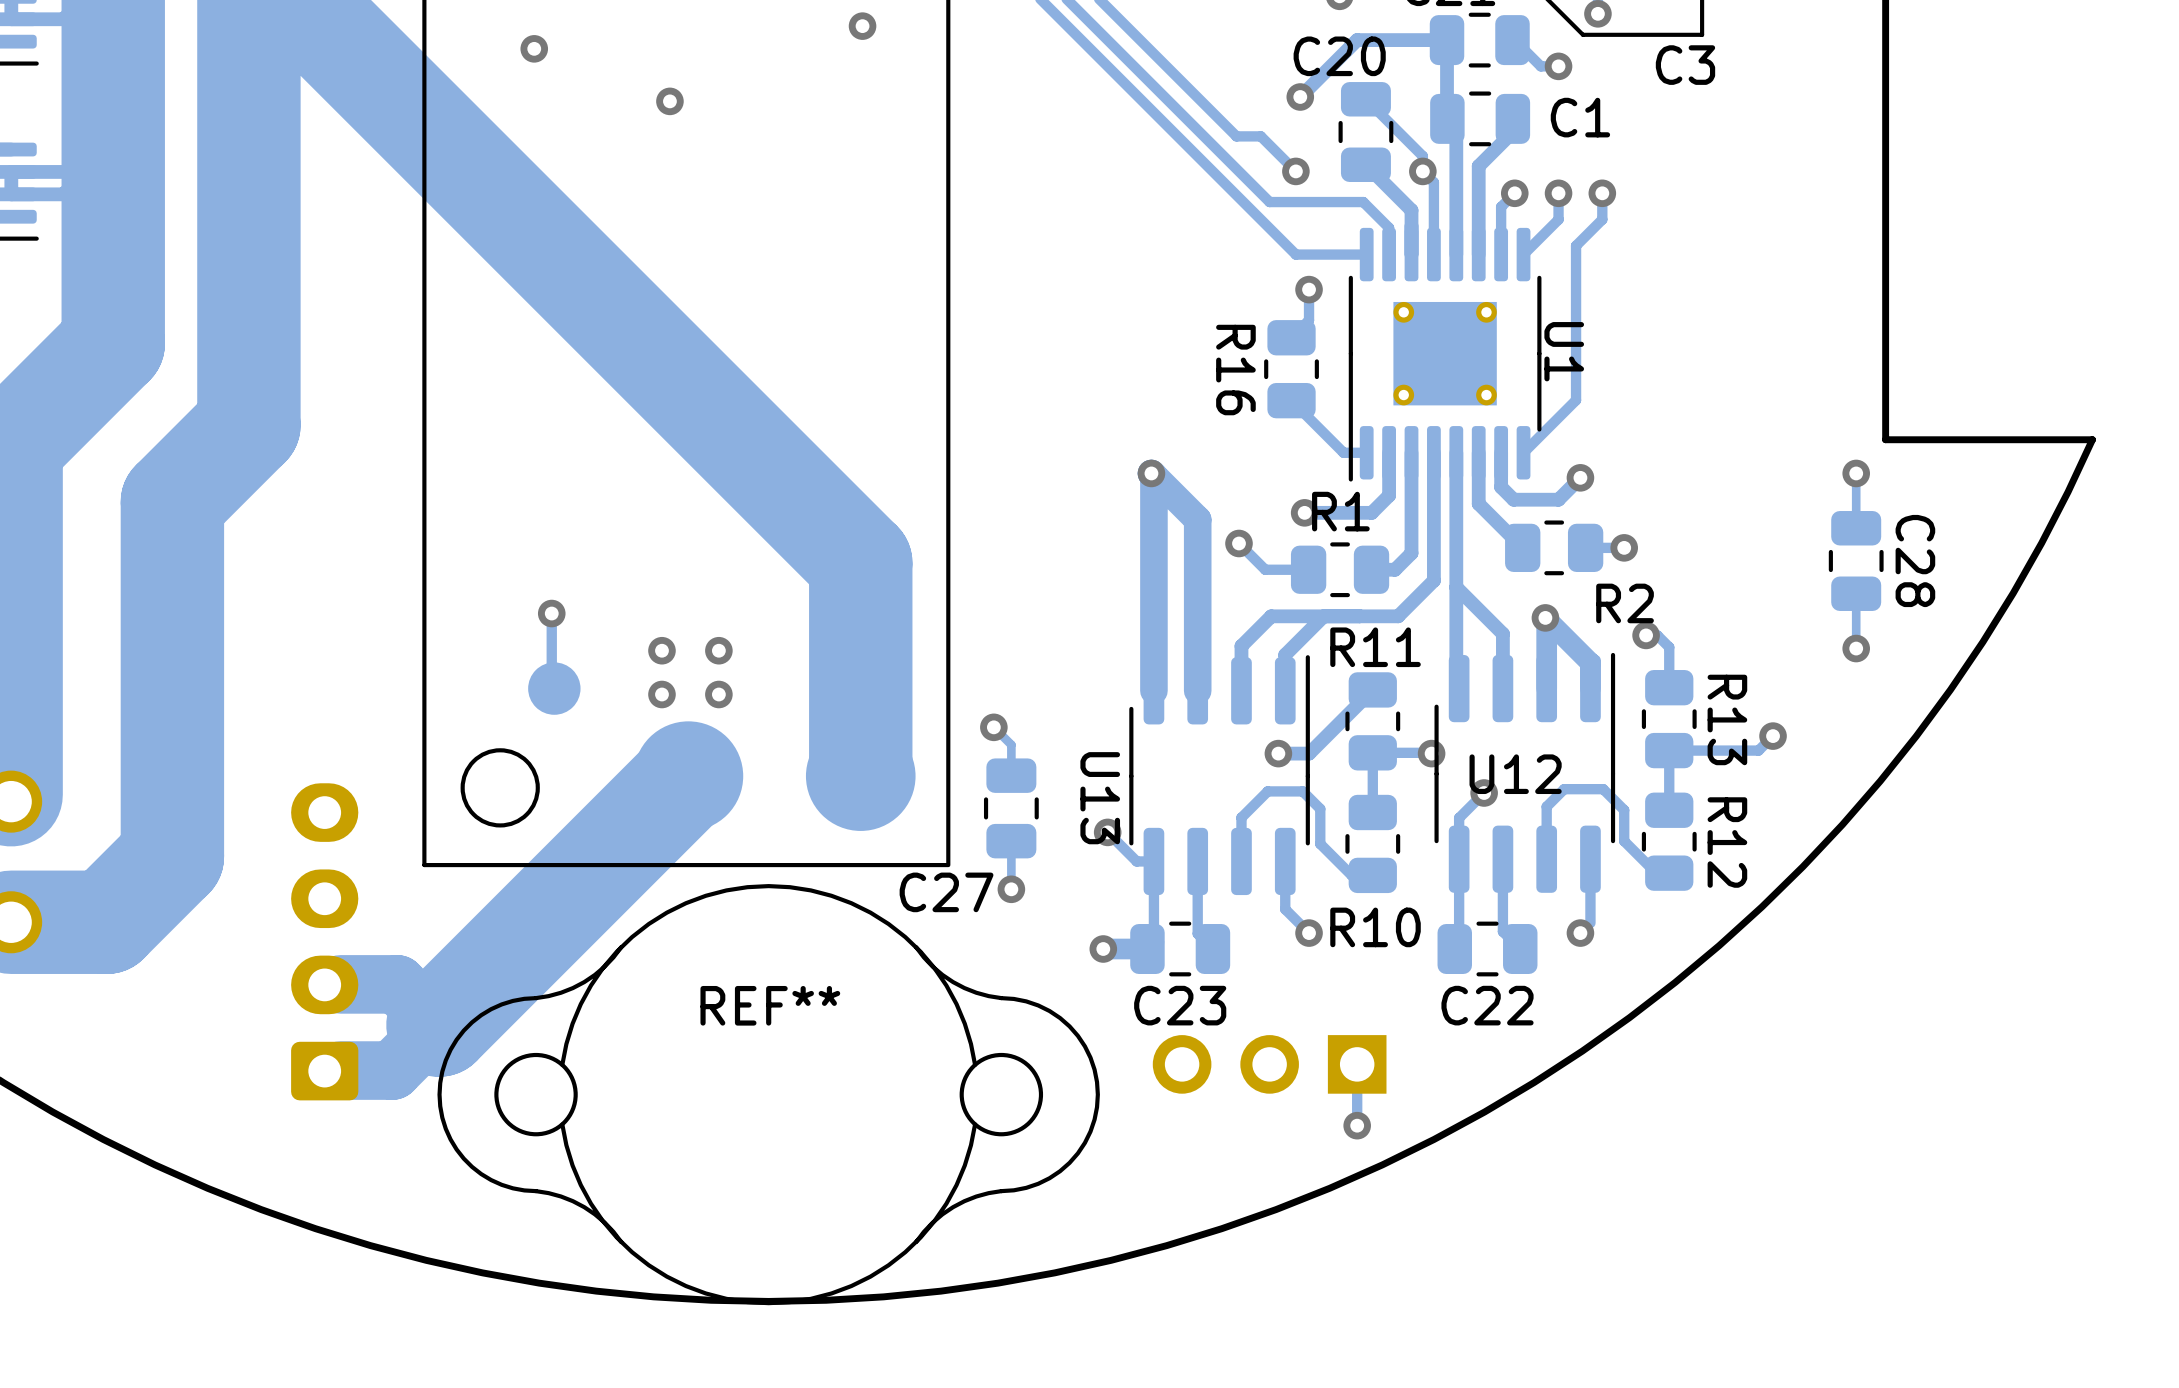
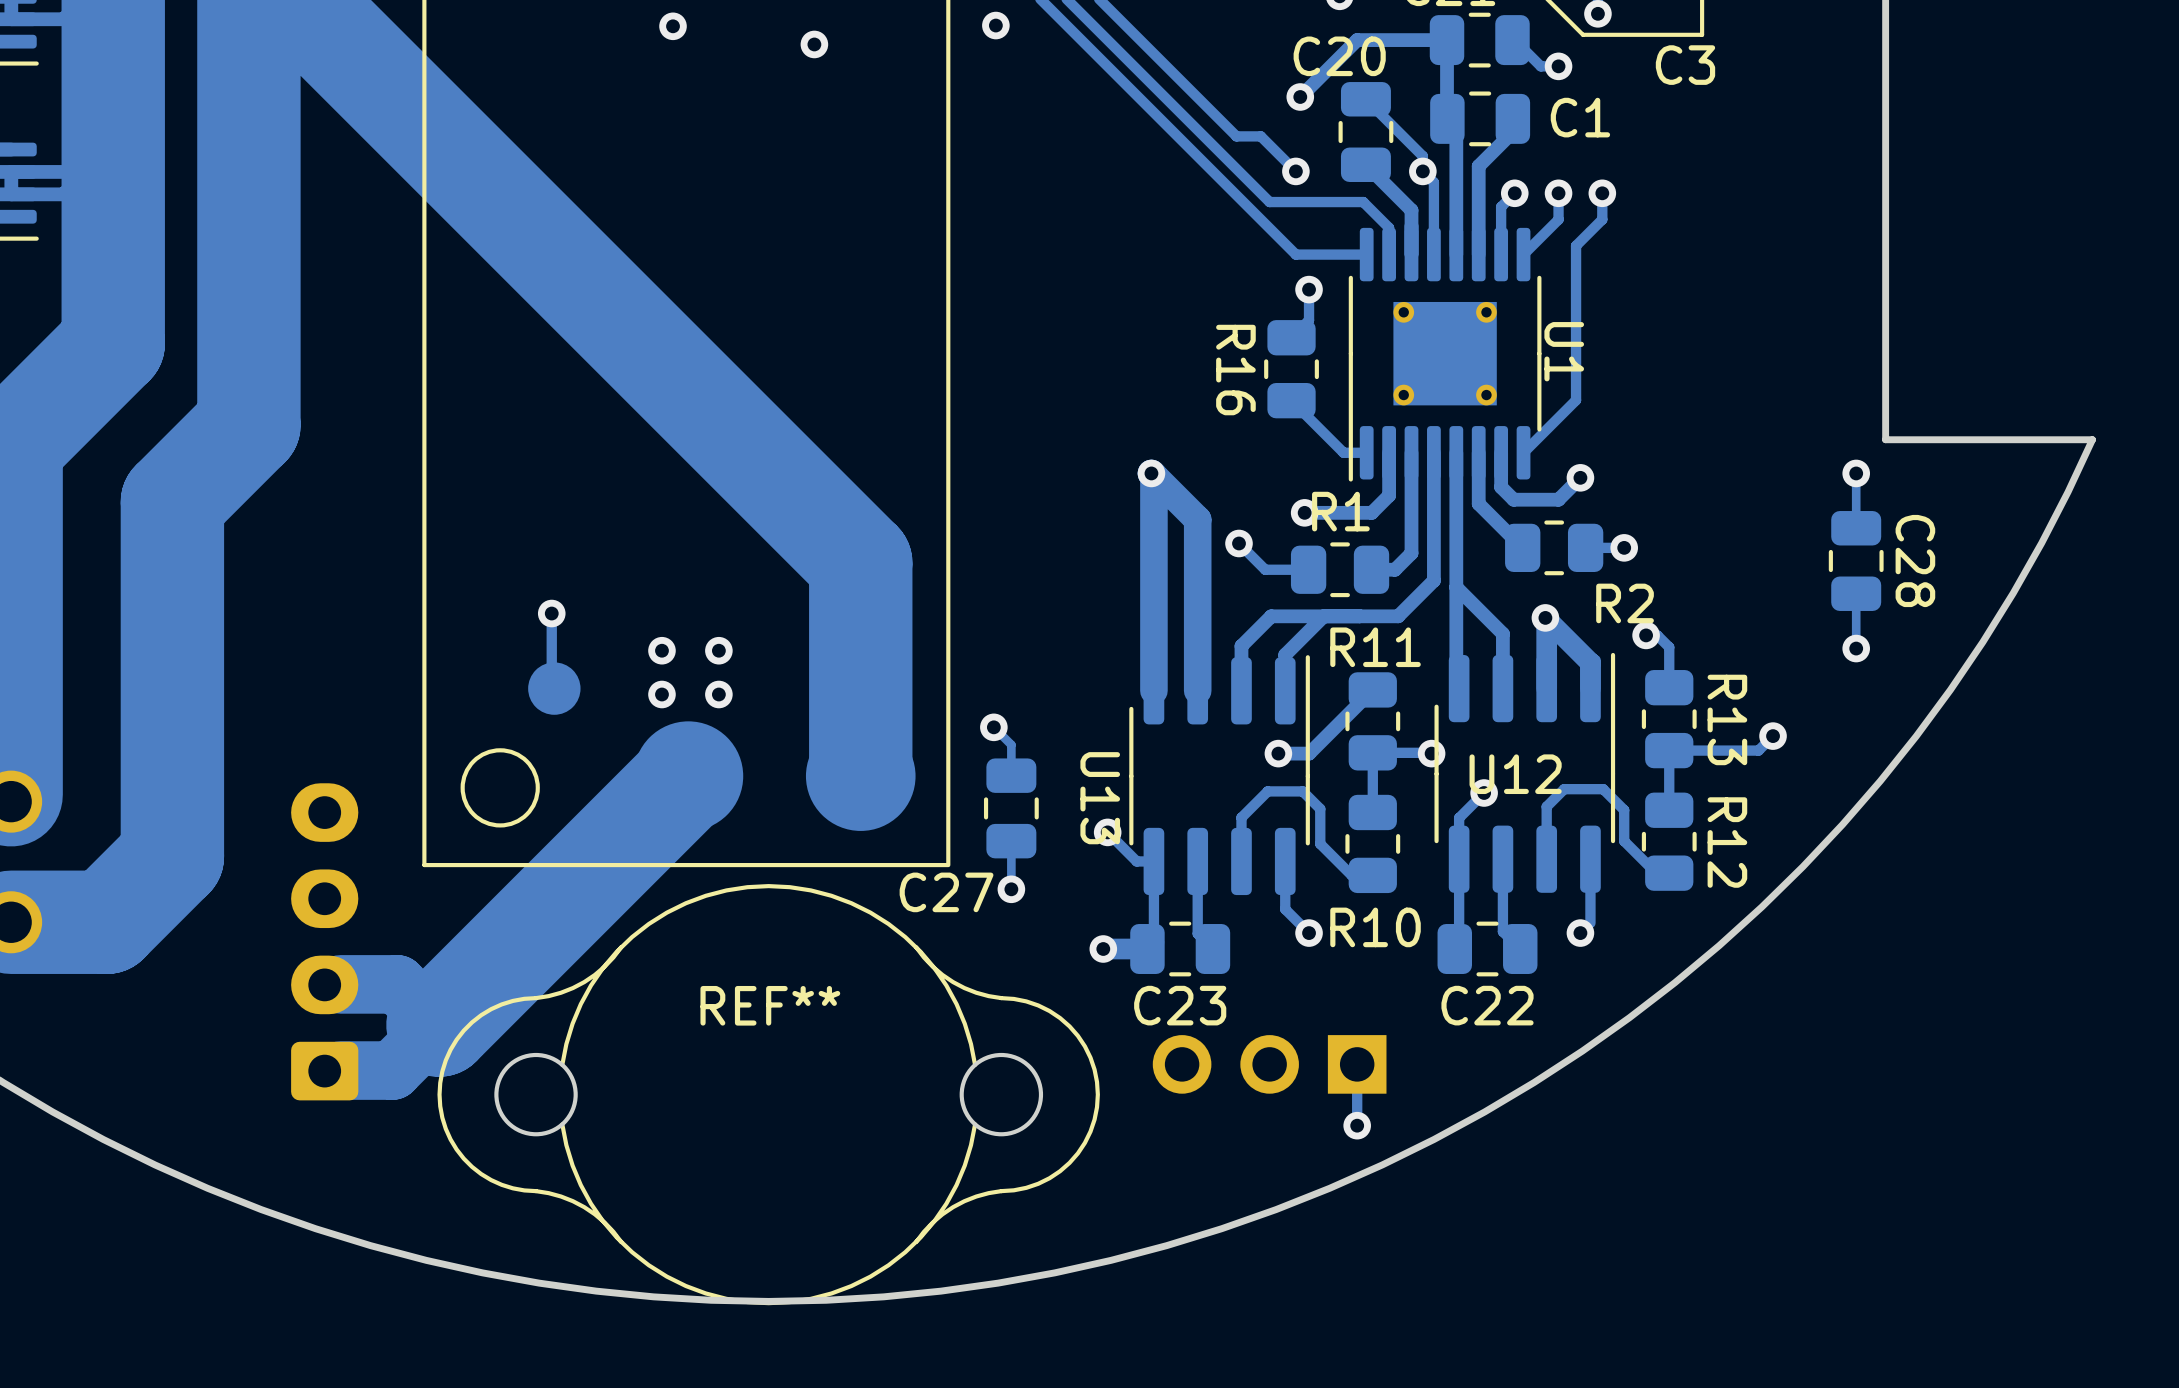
via: none -> (995, 25)
via: none -> (673, 26)
via position: (862, 26) -> (814, 44)
via: (534, 48) -> none
via: (669, 101) -> none

